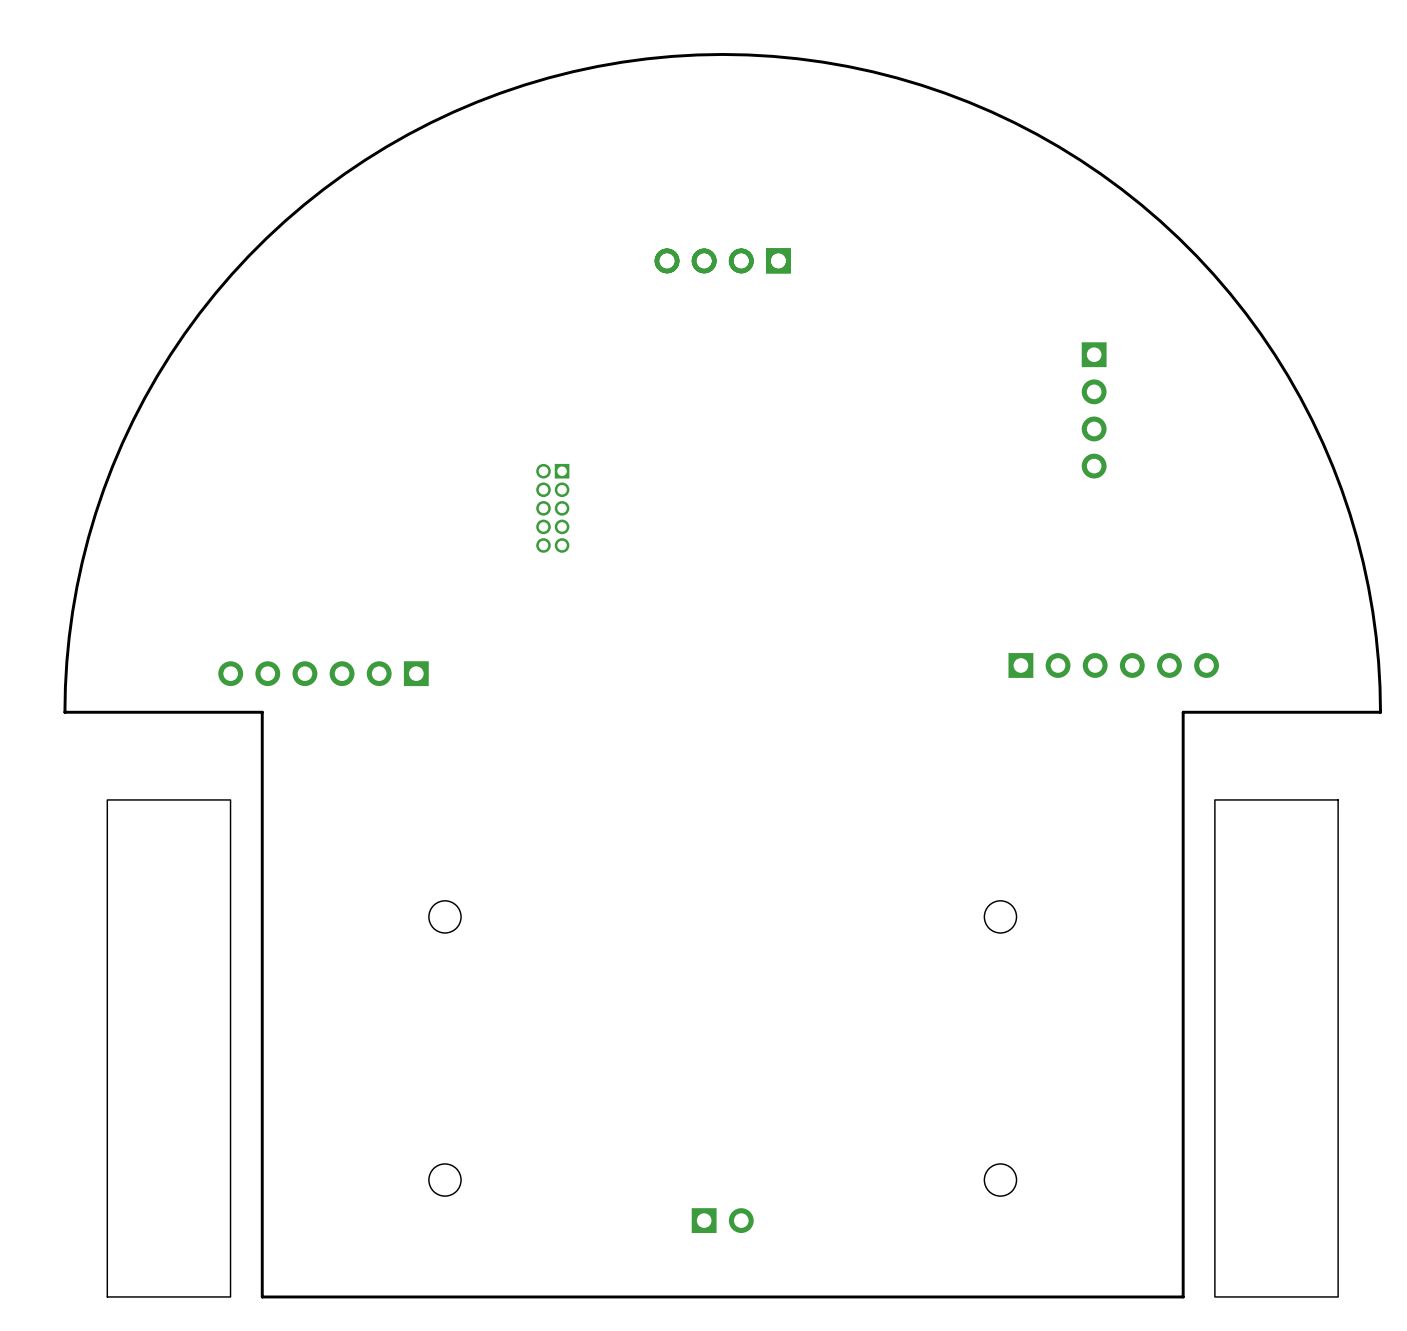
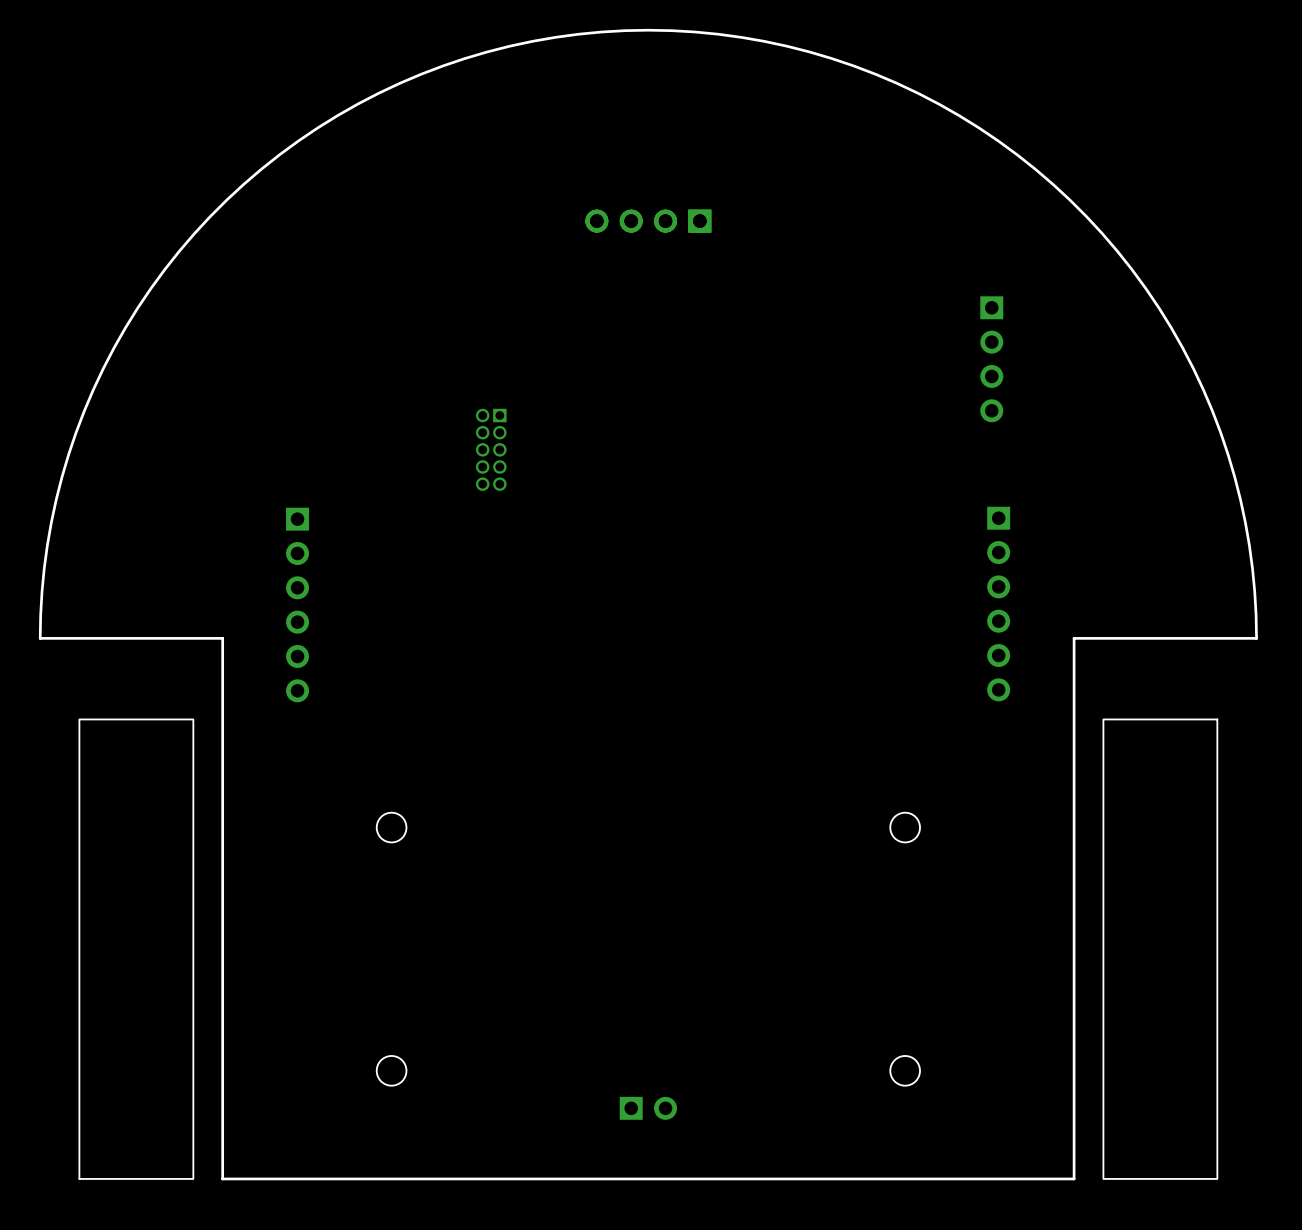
part rotation: 0° (1113, 665) -> 90° clockwise (998, 604)
part rotation: 0° (323, 673) -> 90° counterclockwise (297, 604)

